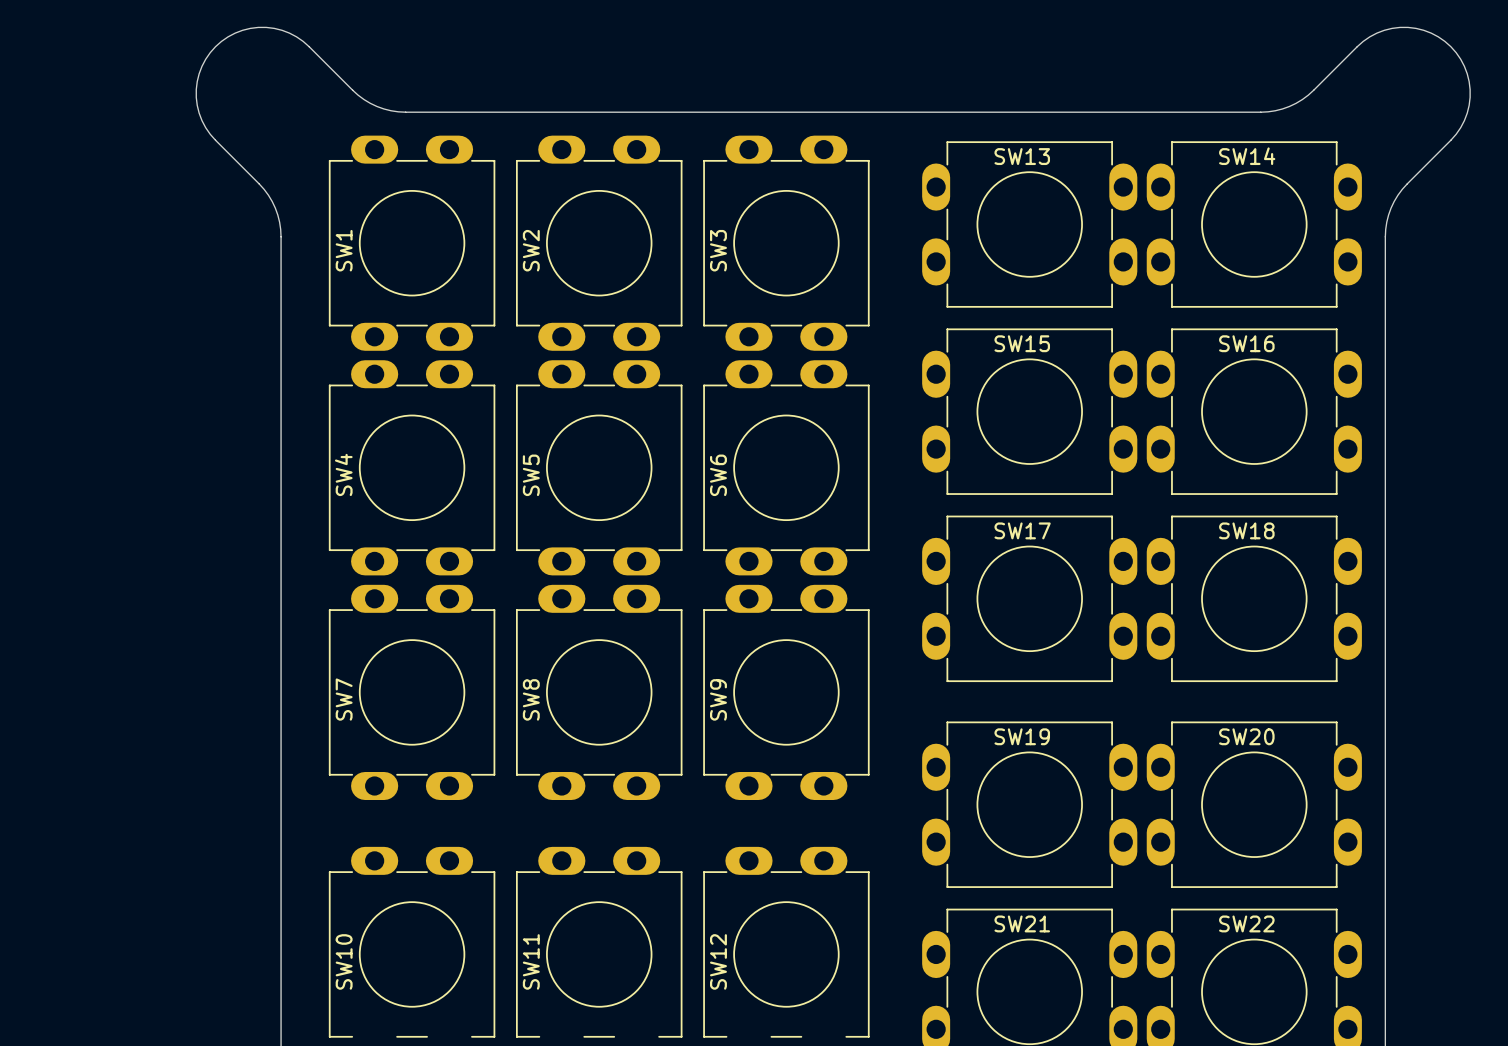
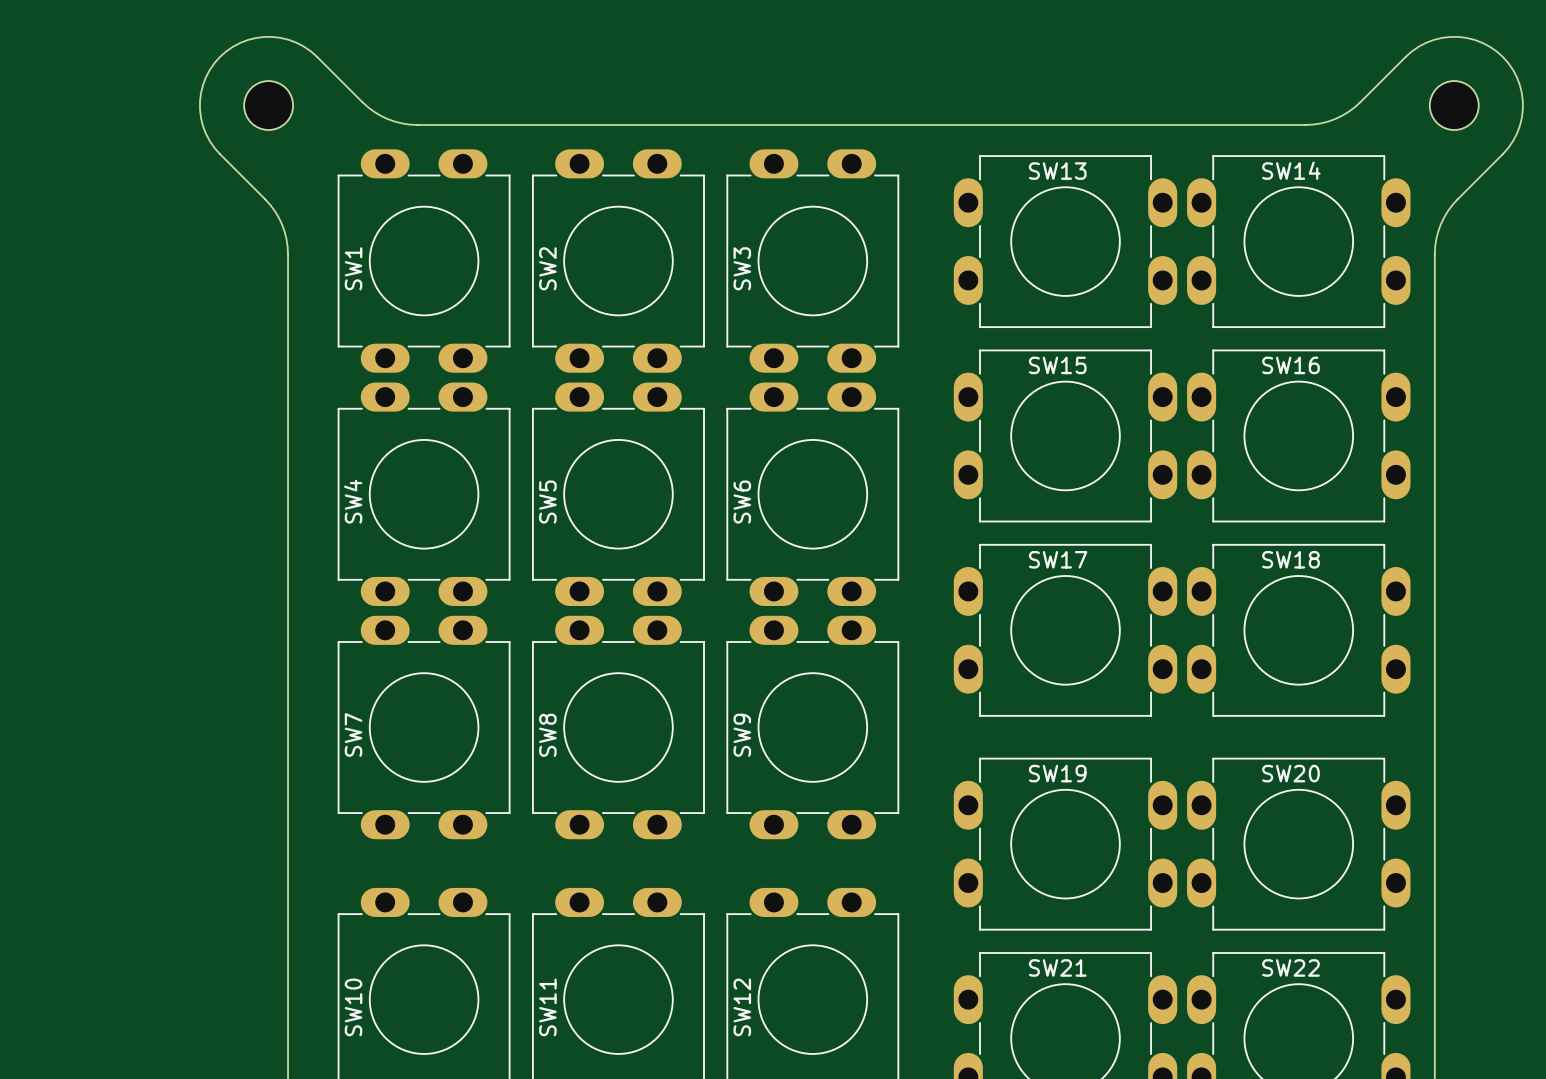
part: none -> (268, 105)
part: none -> (1454, 105)

